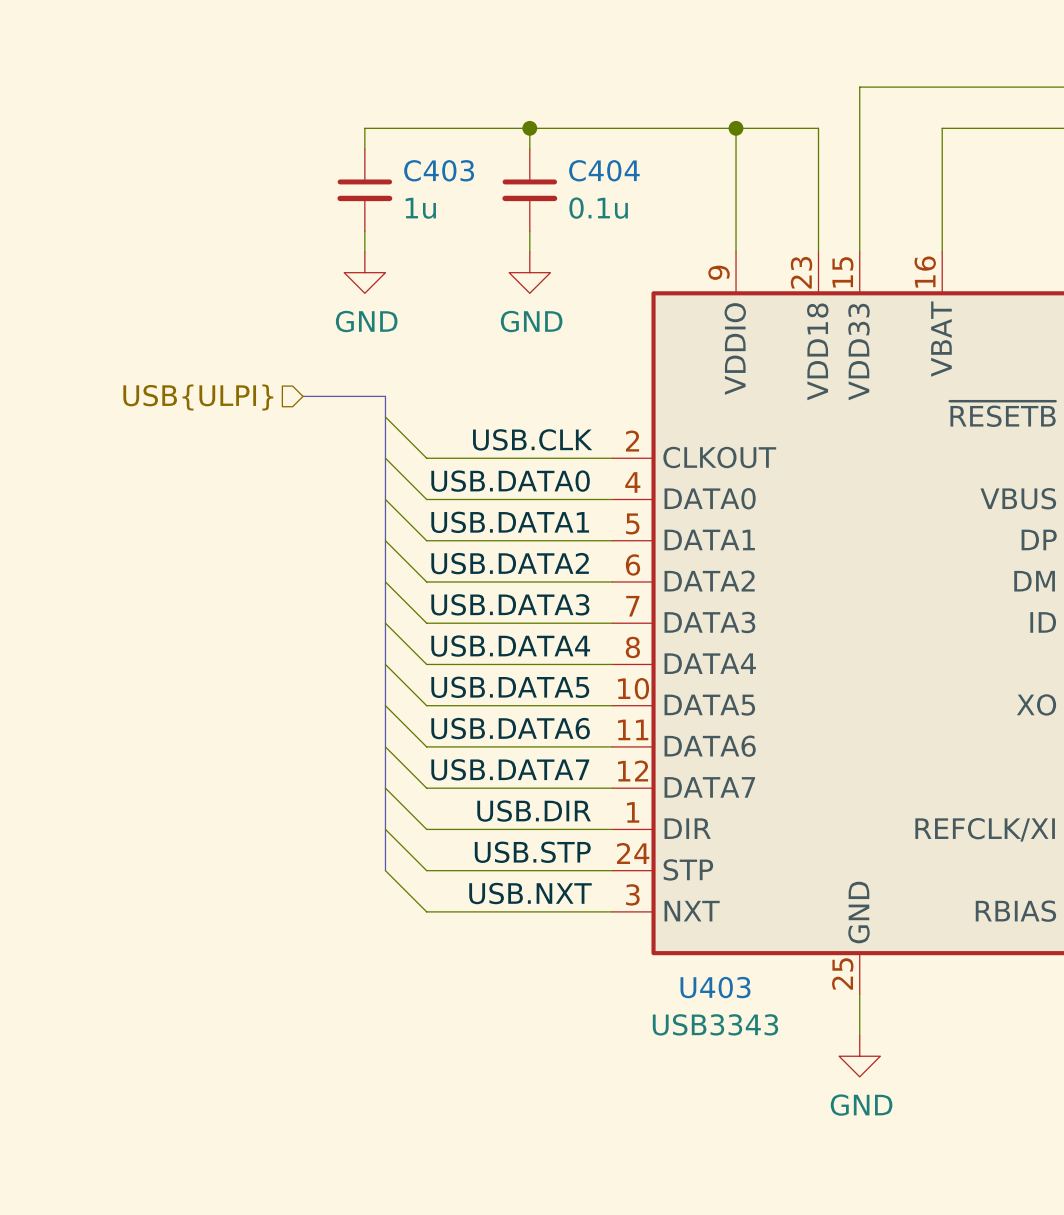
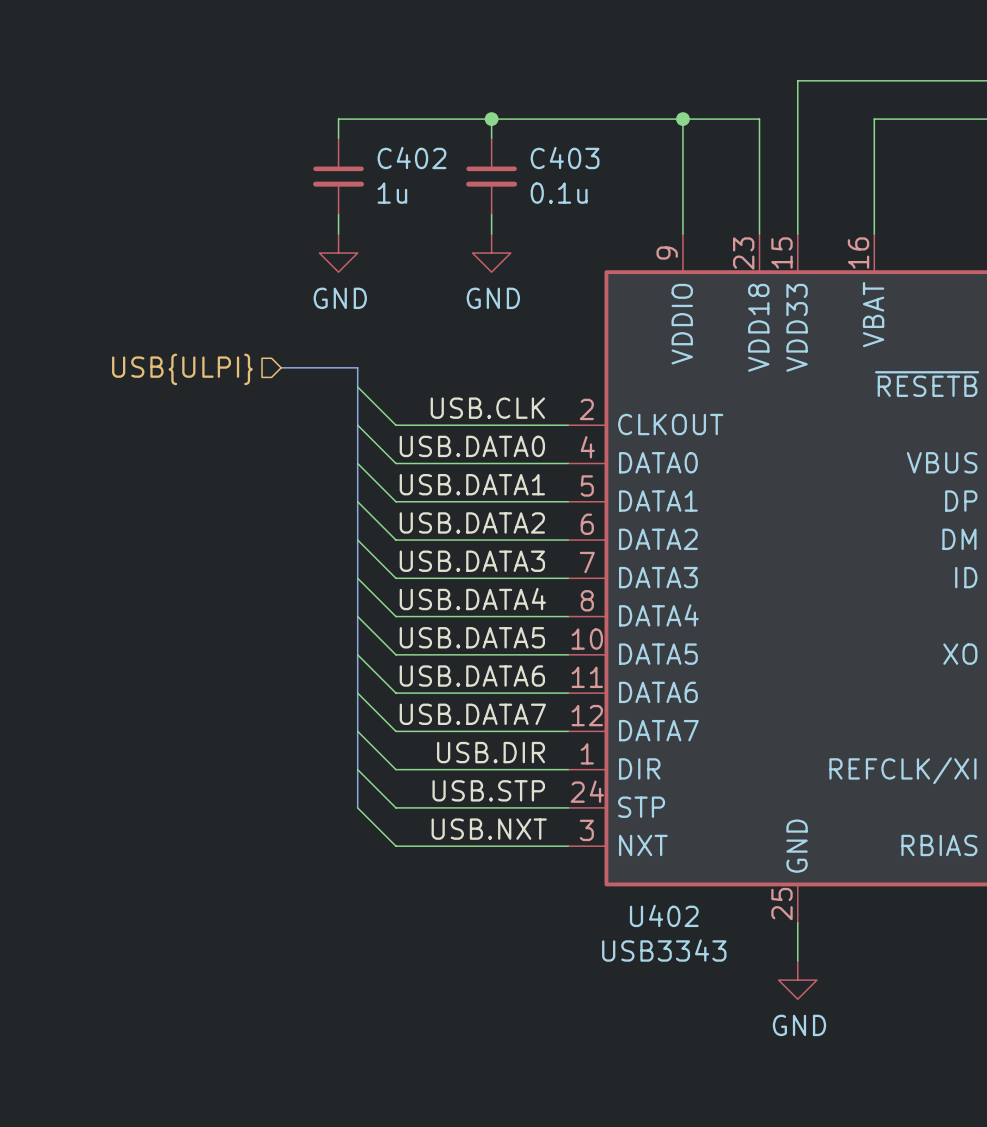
C403 name: C403 (439, 170) -> C402 (411, 158)
C404 name: C404 (604, 170) -> C403 (565, 158)
U403 name: U403 (715, 987) -> U402 (664, 915)

